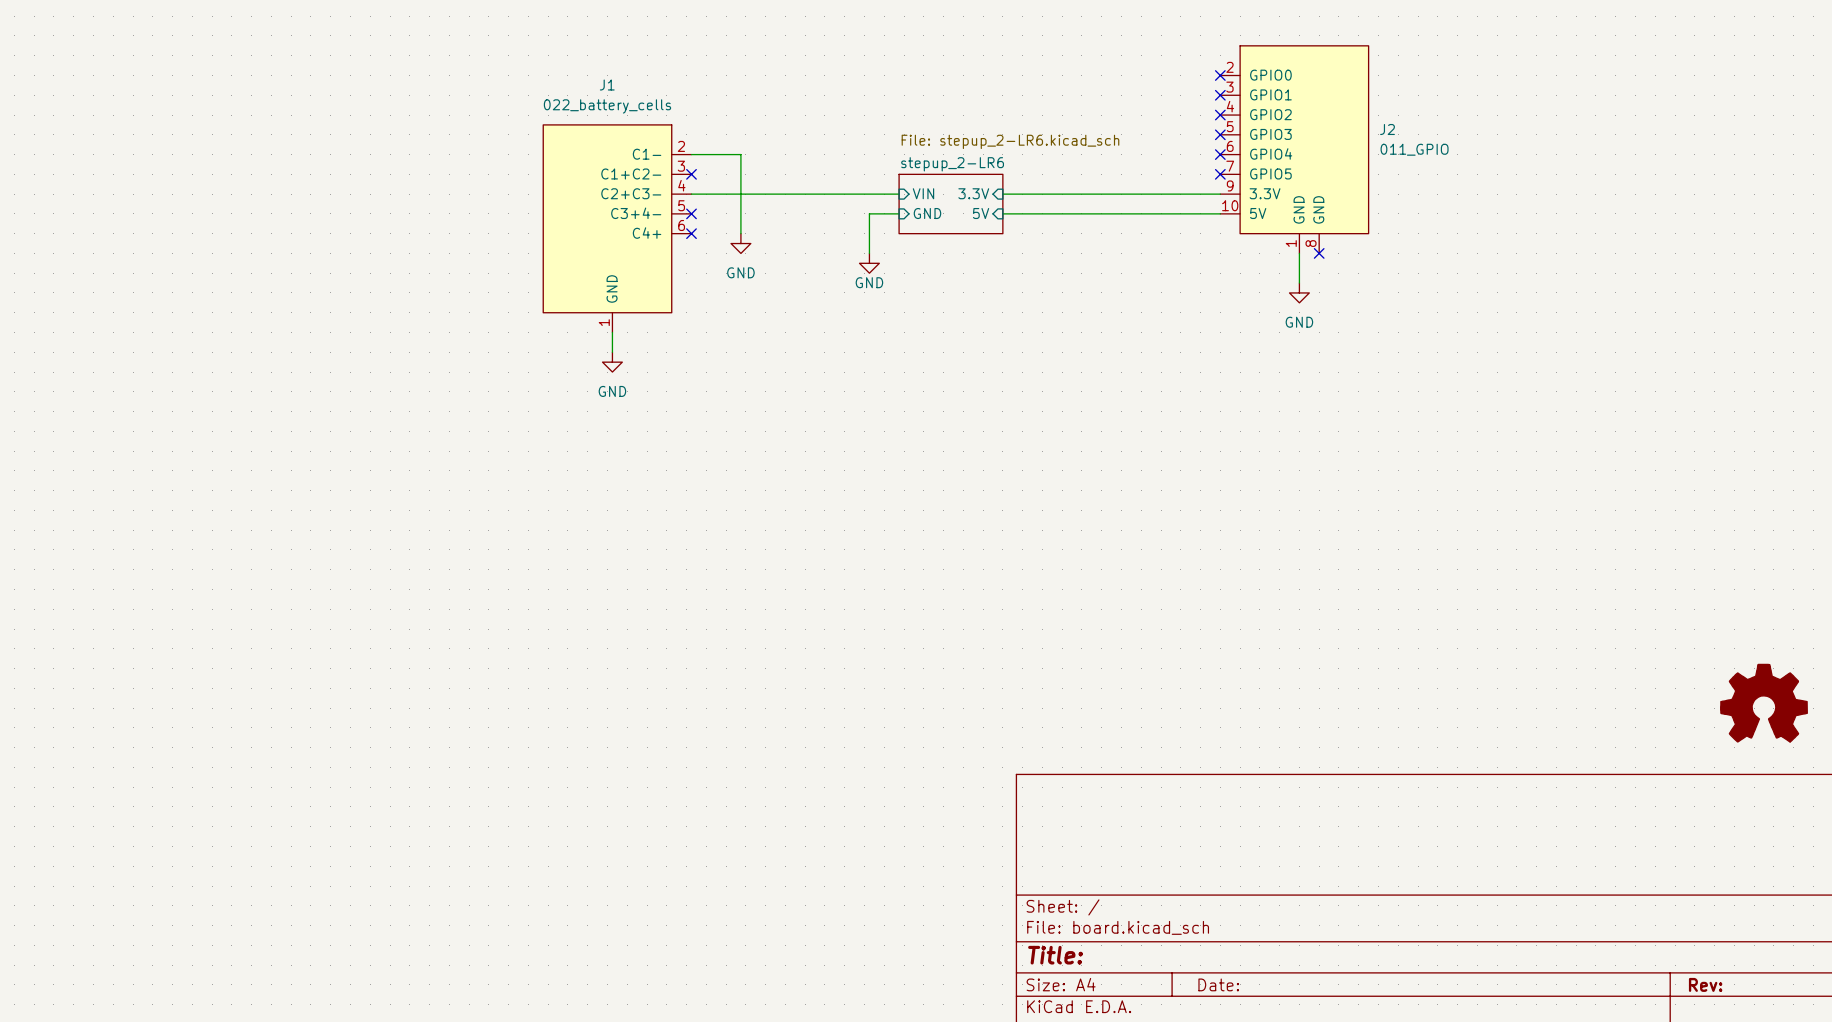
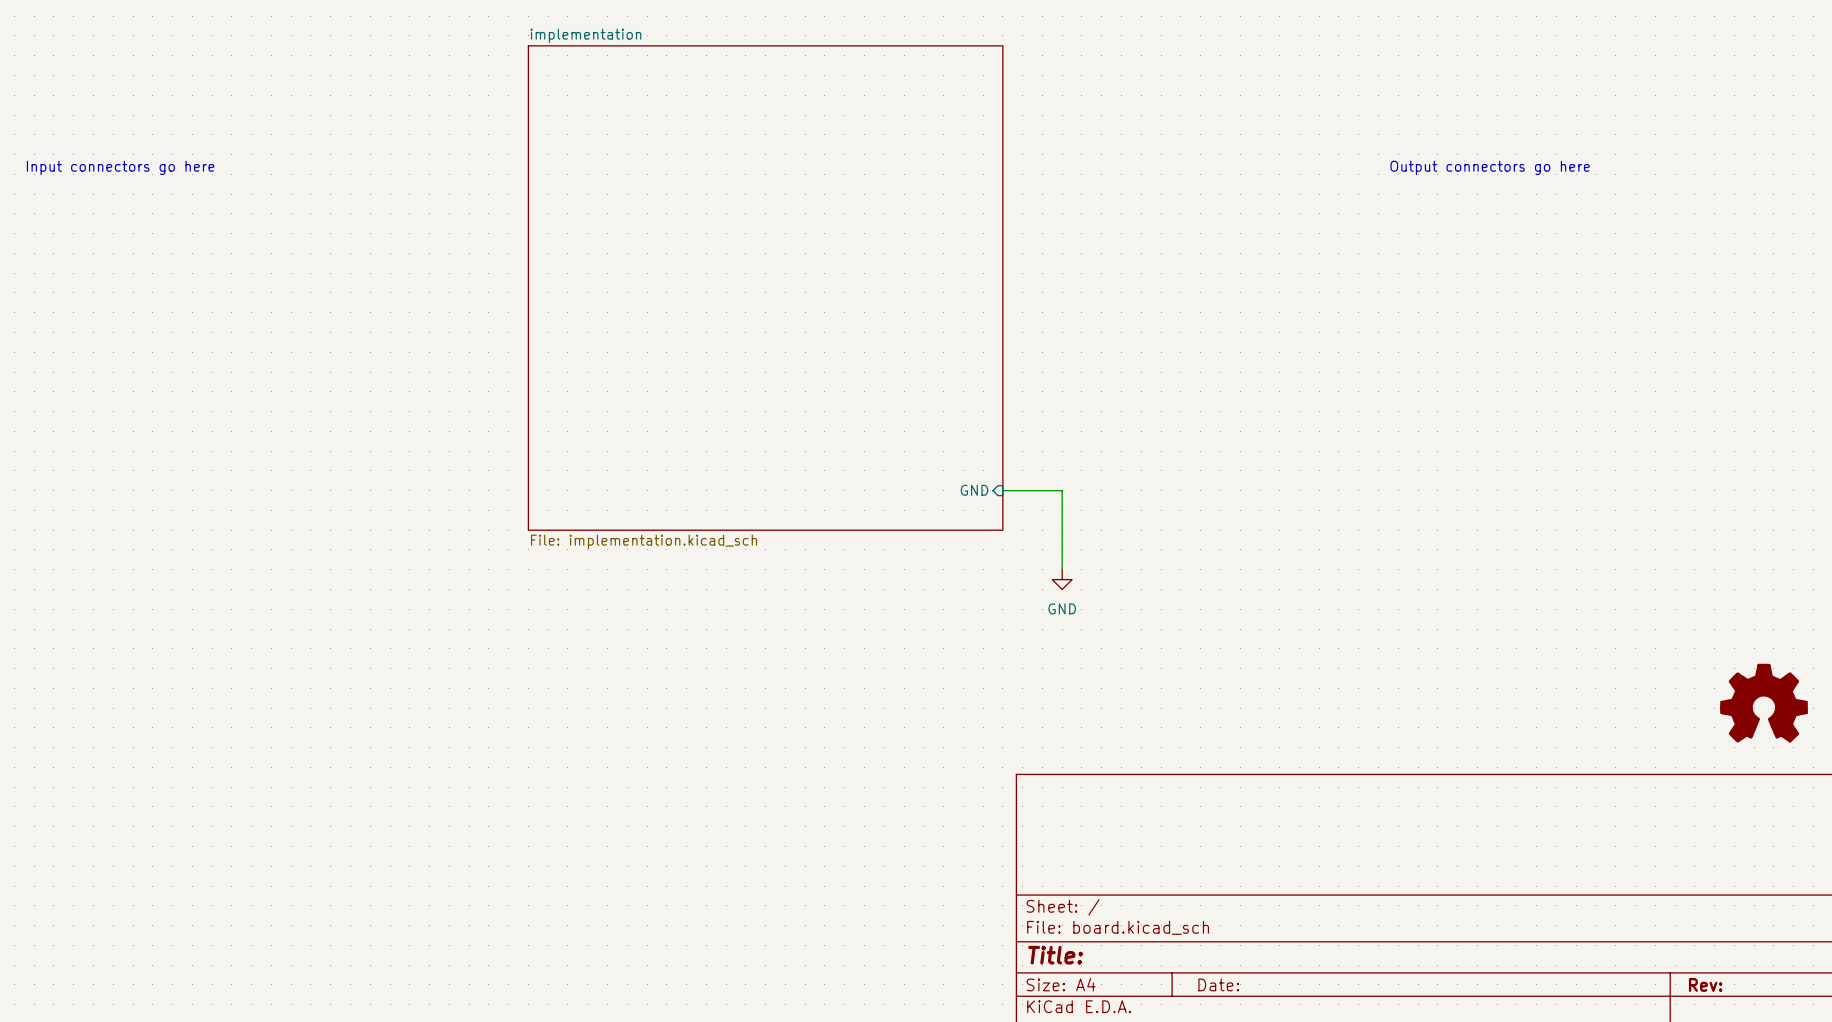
no-connect mark: (1220, 75) -> none
no-connect mark: (1220, 95) -> none
no-connect mark: (1220, 115) -> none
no-connect mark: (1220, 134) -> none
J2: 011_GPIO (1294, 149) -> none
wire: (691, 154) (740, 154) (740, 233) -> none
no-connect mark: (1220, 154) -> none
text: none -> Input connectors go here (120, 167)
text: none -> Output connectors go here (1490, 167)
no-connect mark: (691, 174) -> none
no-connect mark: (1220, 174) -> none
sheet pin: VIN (923, 193) -> none
sheet pin: 3.3V (973, 193) -> none
wire: (691, 194) (899, 194) -> none
wire: (1002, 194) (1220, 194) -> none
sheet stepup_2-LR6: File: stepup_2-LR6.kicad_sch (950, 204) -> none
no-connect mark: (691, 213) -> none
wire: (899, 213) (869, 213) (869, 253) -> none
sheet pin: GND (927, 213) -> none
sheet pin: 5V (981, 213) -> none
wire: (1002, 213) (1220, 213) -> none
J1: 022_battery_cells (617, 228) -> none
no-connect mark: (691, 233) -> none
power symbol: GND (740, 243) -> none
wire: (1299, 253) (1299, 283) -> none
no-connect mark: (1319, 253) -> none
power symbol: GND (869, 263) -> none
sheet implementation: none -> File: implementation.kicad_sch (765, 288)
power symbol: GND (1299, 292) -> none
wire: (612, 332) (612, 352) -> none
power symbol: GND (612, 362) -> none
sheet pin: none -> GND (974, 490)
wire: none -> (1002, 490) (1062, 490) (1062, 569)
power symbol: none -> GND (1062, 579)

